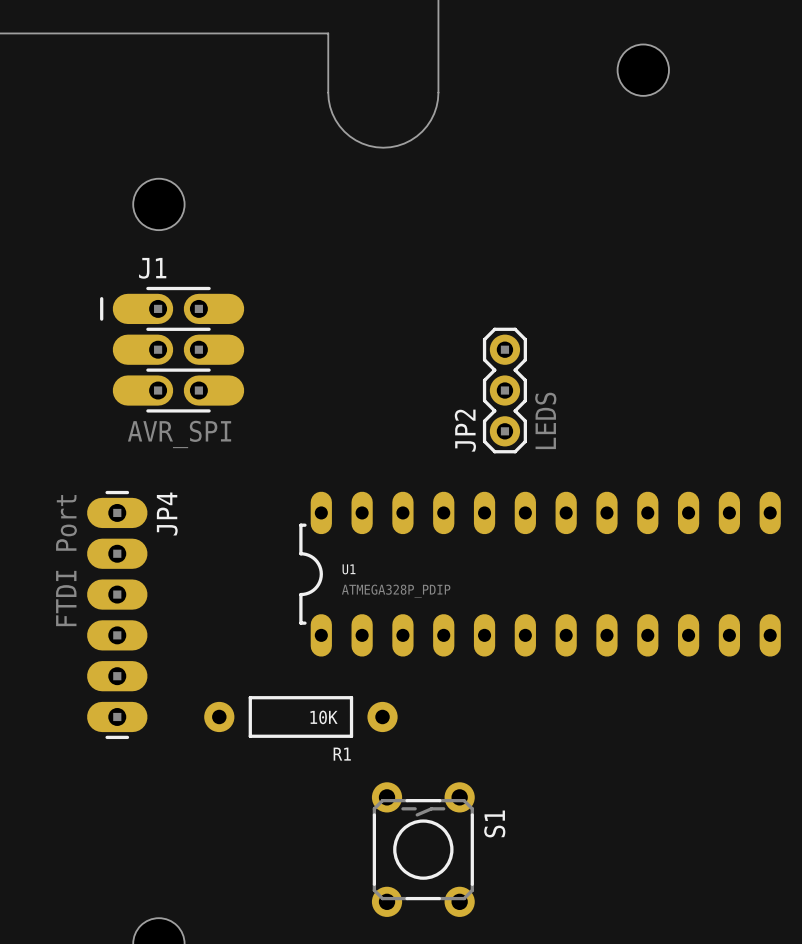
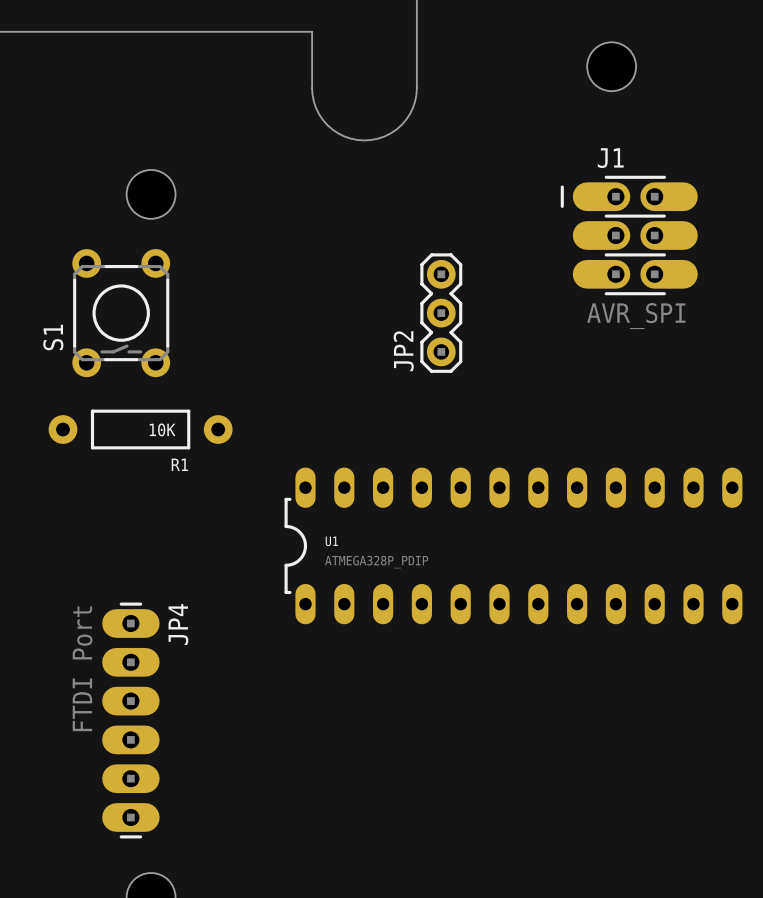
J1 position: (172, 349) -> (629, 235)
JP2 position: (504, 390) -> (441, 313)
JP2 value: LEDS (545, 420) -> none
JP4 position: (117, 614) -> (130, 720)
R1 position: (300, 716) -> (140, 429)
S1 rotation: 0° (423, 849) -> 180° (121, 313)
S1 position: (423, 849) -> (121, 313)

